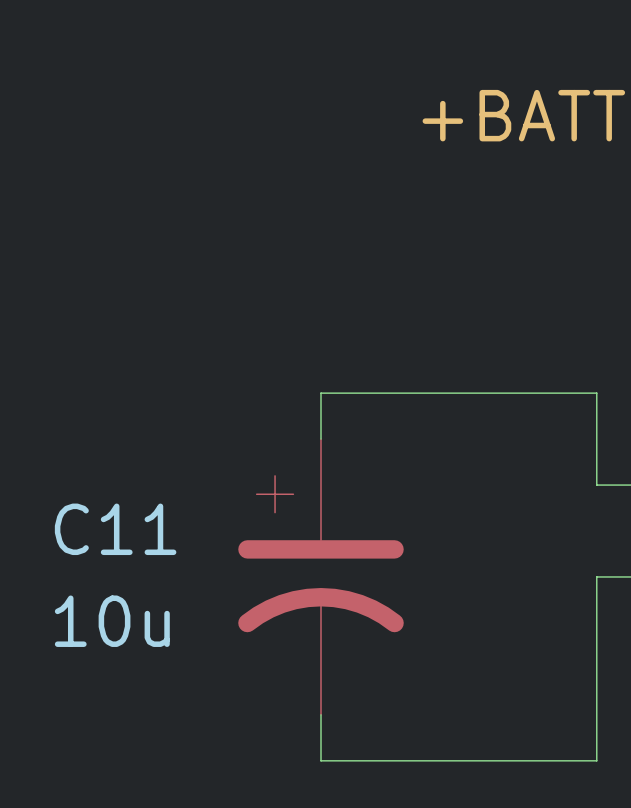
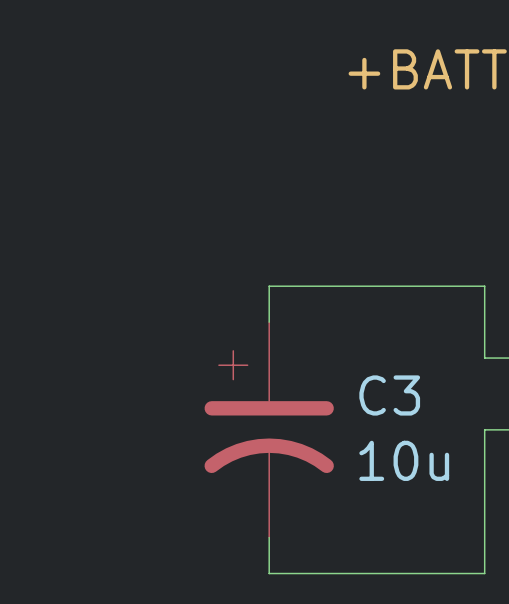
C11 name: C11 (115, 529) -> C3 (389, 395)
C11 value position: 10u (112, 621) -> 10u (404, 460)

